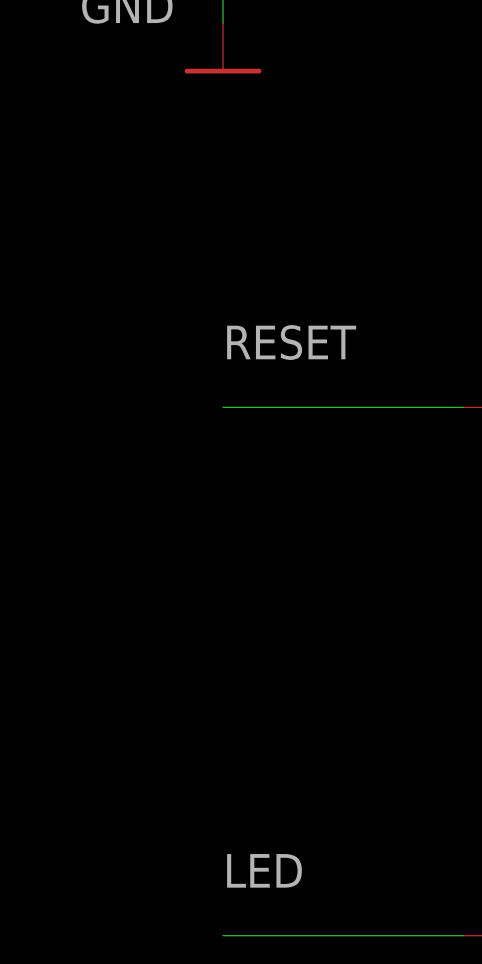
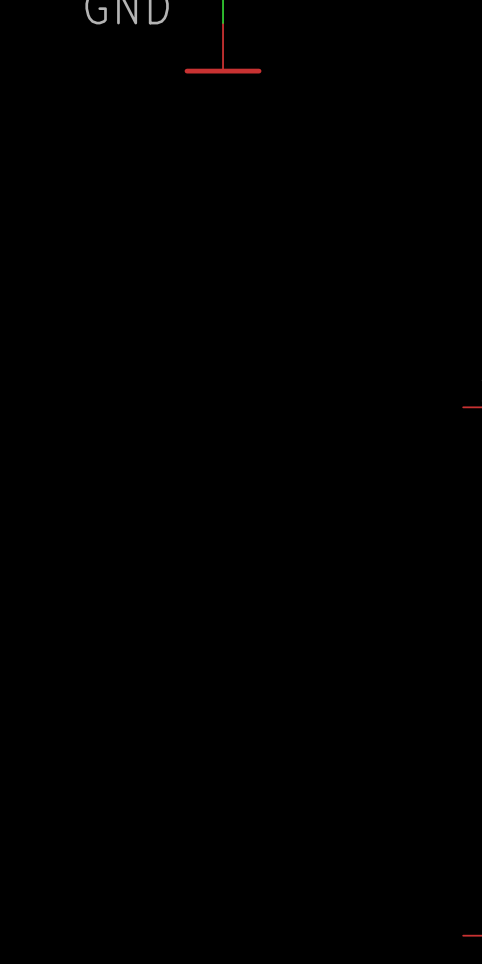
label: RESET (291, 342) -> none
wire: (223, 407) (463, 407) -> none
label: LED (264, 870) -> none
wire: (223, 935) (463, 935) -> none

